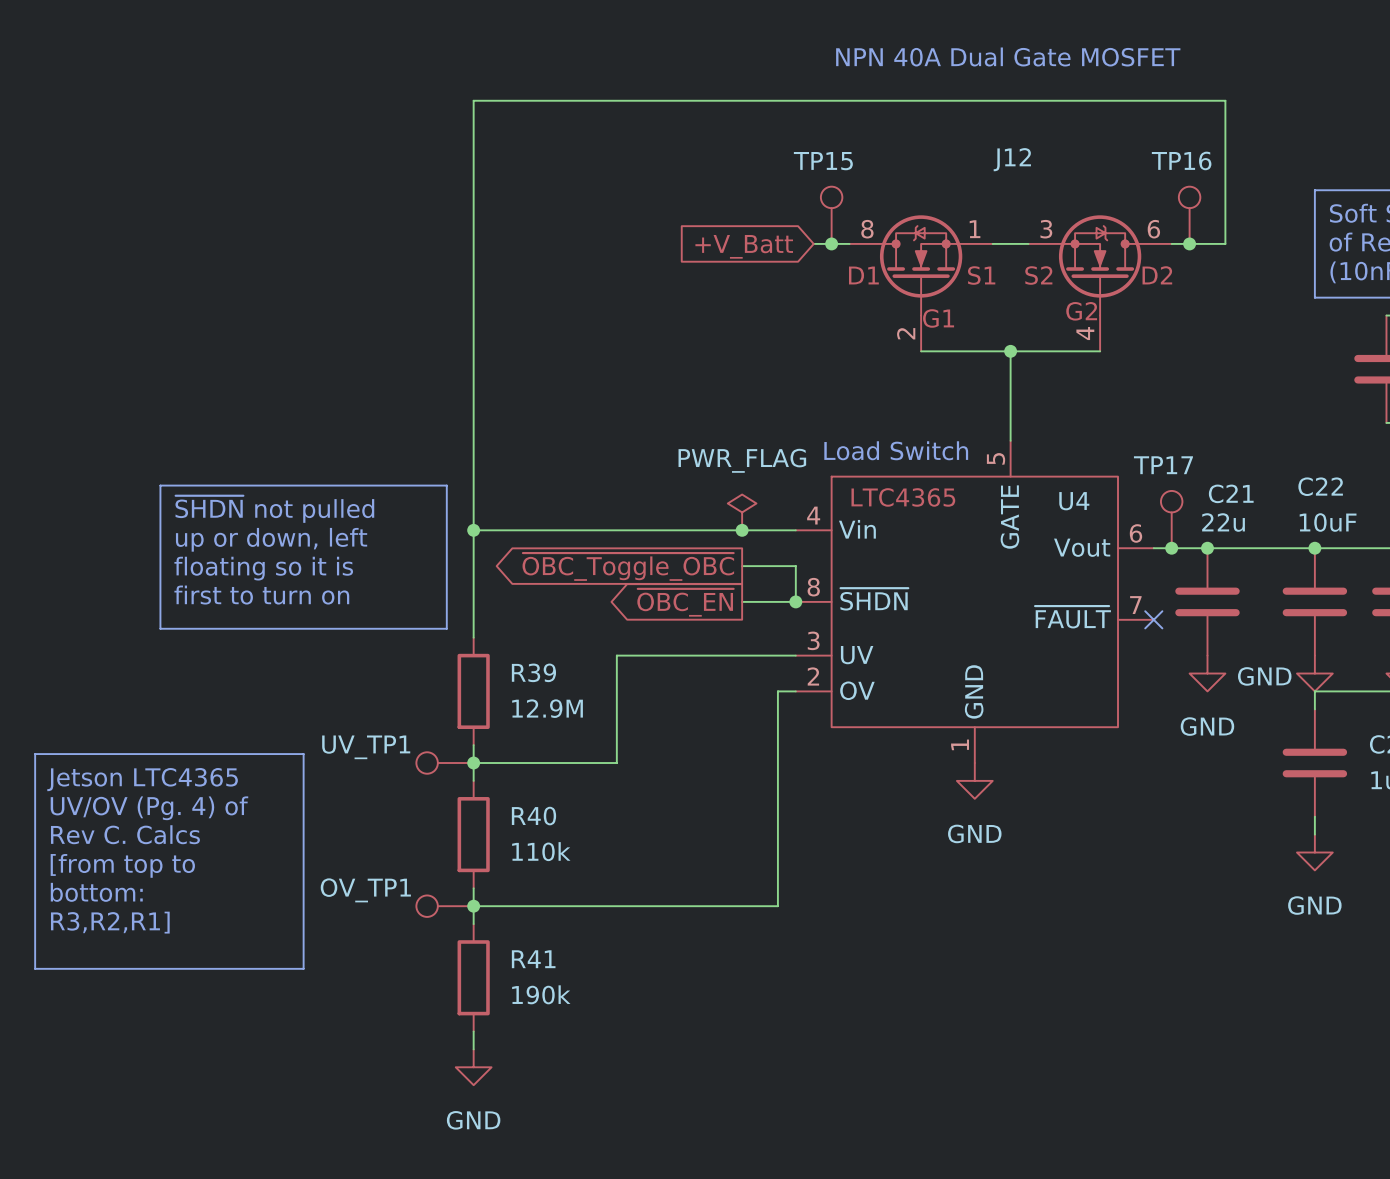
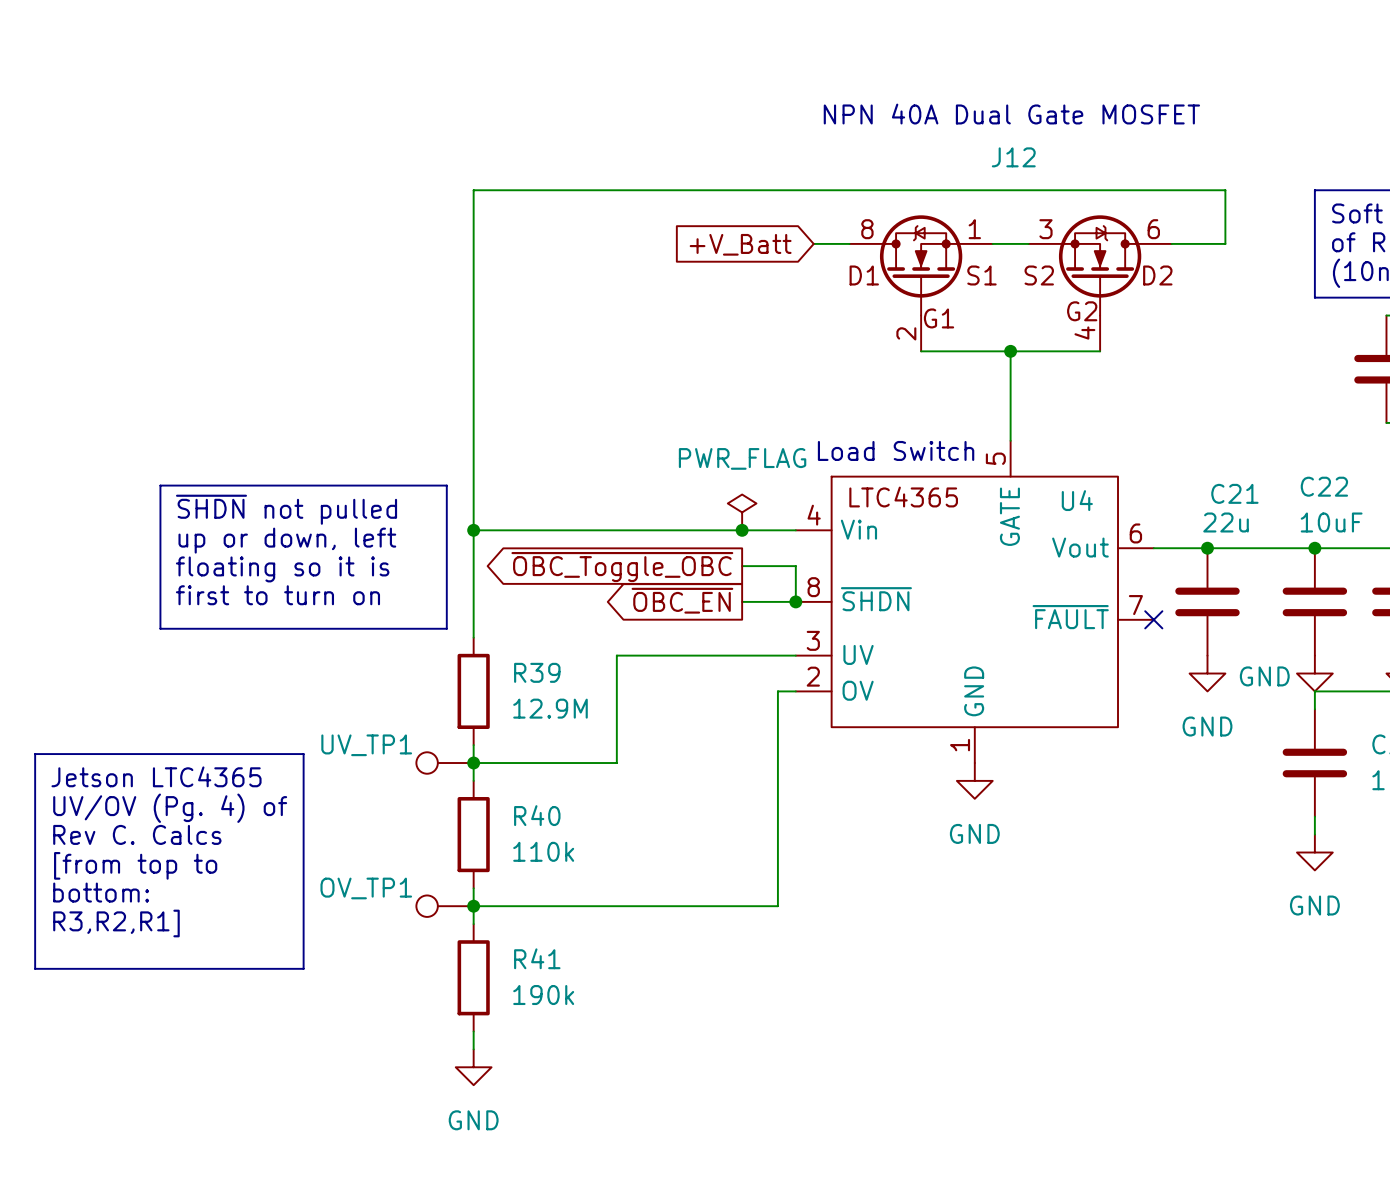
text position: NPN 40A Dual Gate MOSFET (1008, 56) -> NPN 40A Dual Gate MOSFET (1011, 114)
wire: (473, 190) (473, 100) (1225, 100) (1225, 190) -> (473, 190) (1225, 190)
TP15: (831, 215) -> none
TP16: (1189, 215) -> none
junction: (831, 243) -> none
junction: (1189, 243) -> none
TP17: (1171, 519) -> none
junction: (1171, 548) -> none

